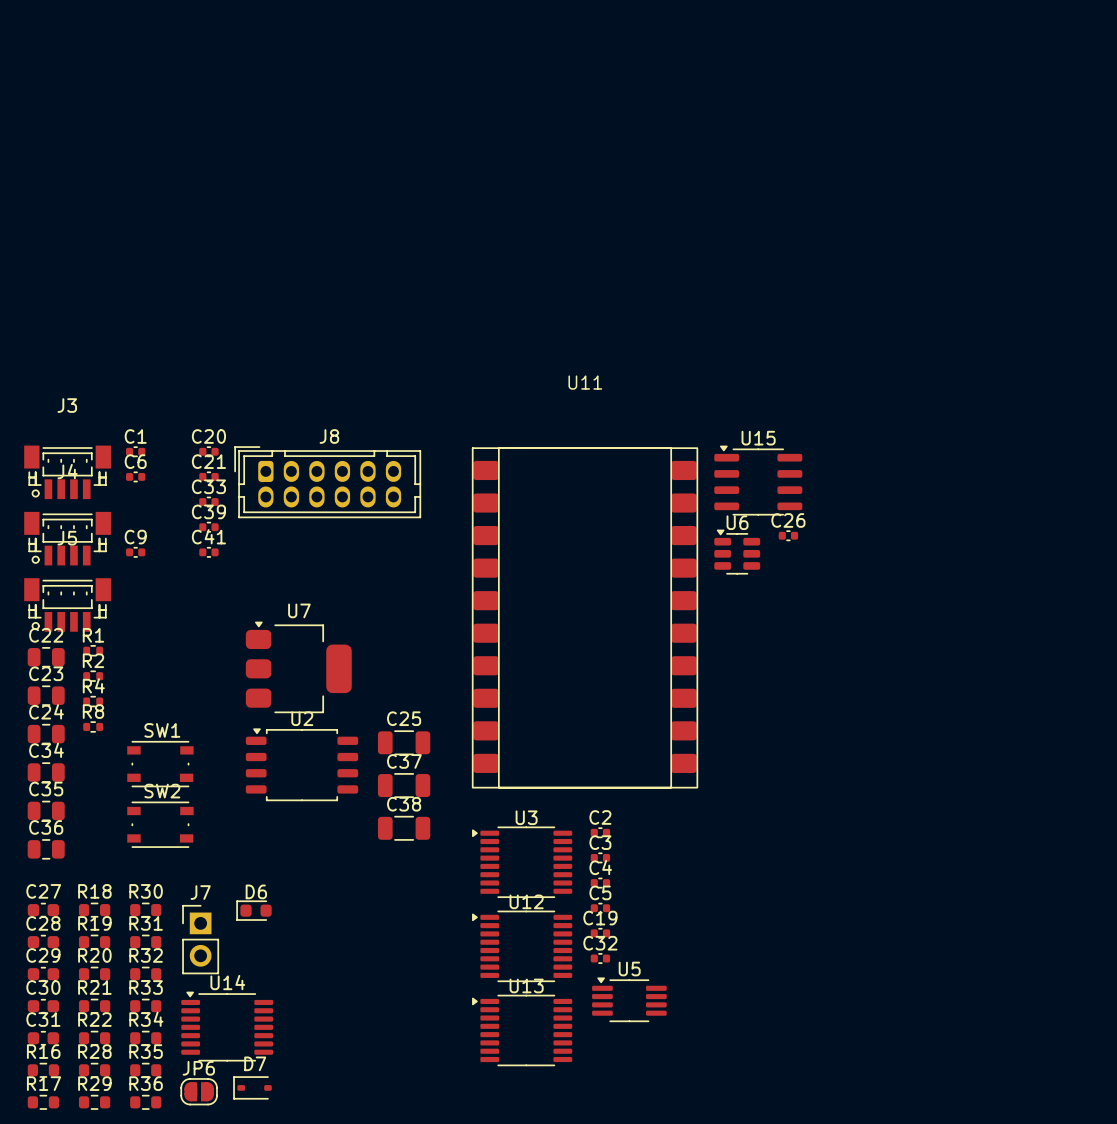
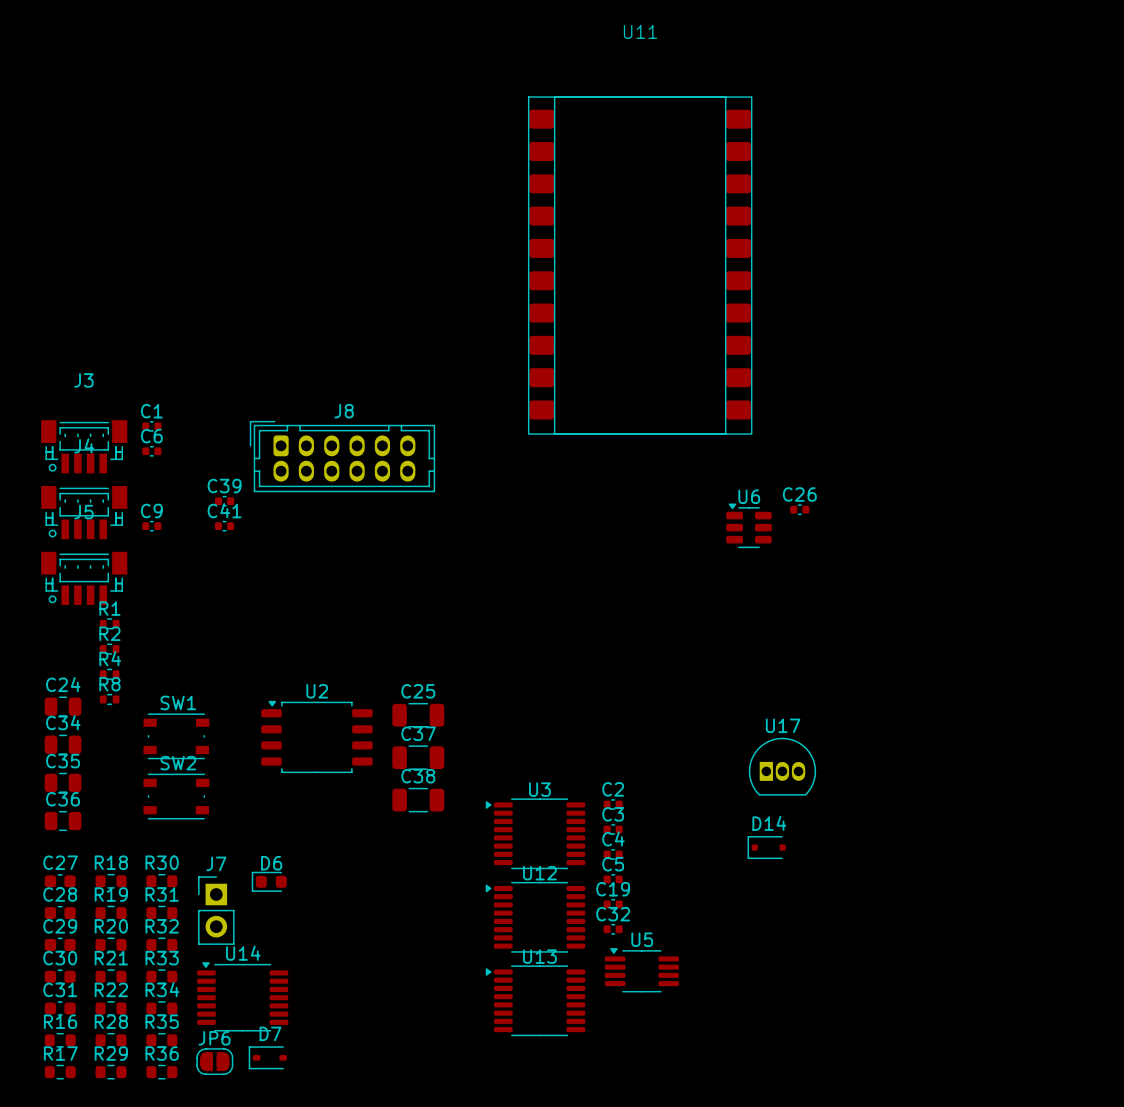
C20: (208, 451) -> none
C21: (208, 476) -> none
U15: (758, 480) -> none
C33: (208, 502) -> none
U11 position: (585, 617) -> (640, 265)
C22: (46, 657) -> none
U7: (298, 667) -> none
C23: (46, 695) -> none
U17: none -> (782, 766)
D14: none -> (766, 847)

